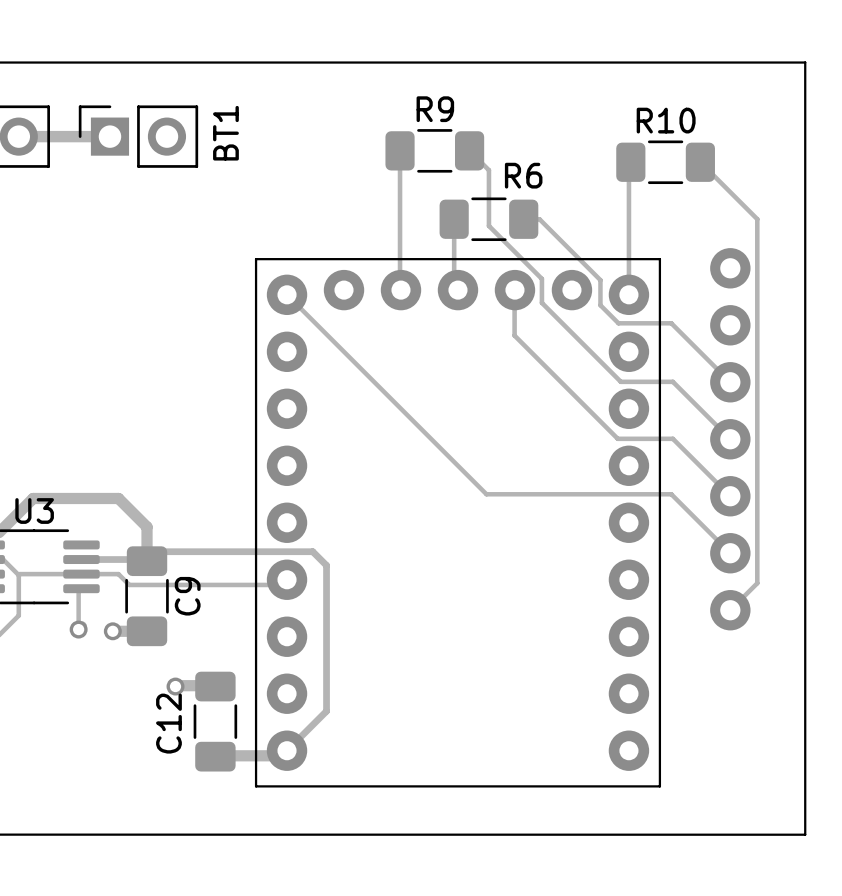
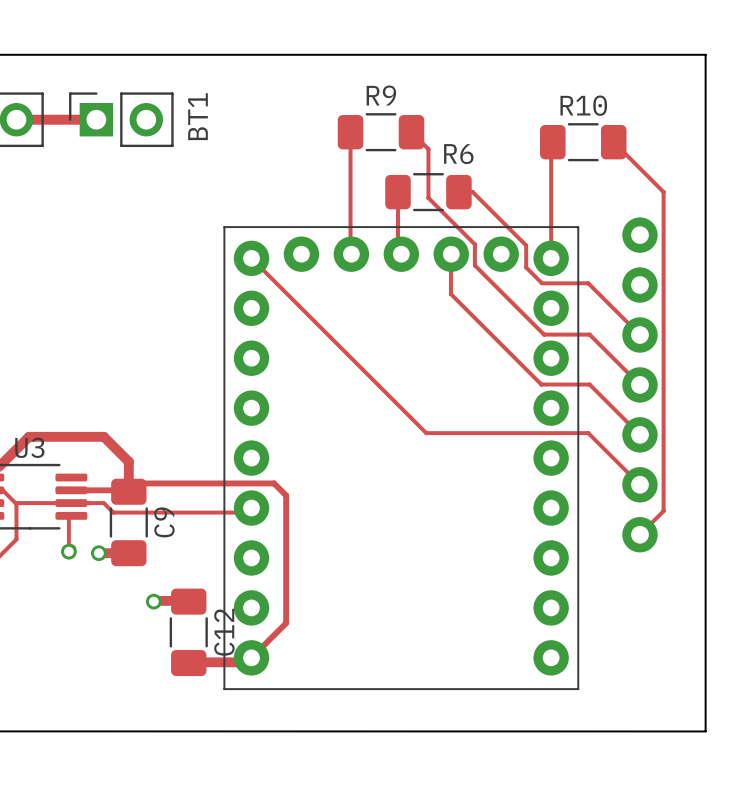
C12 name position: C12 (168, 723) -> C12 (224, 632)

